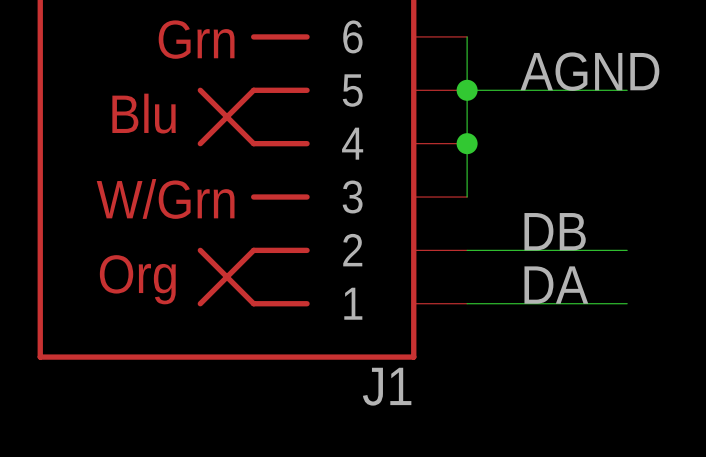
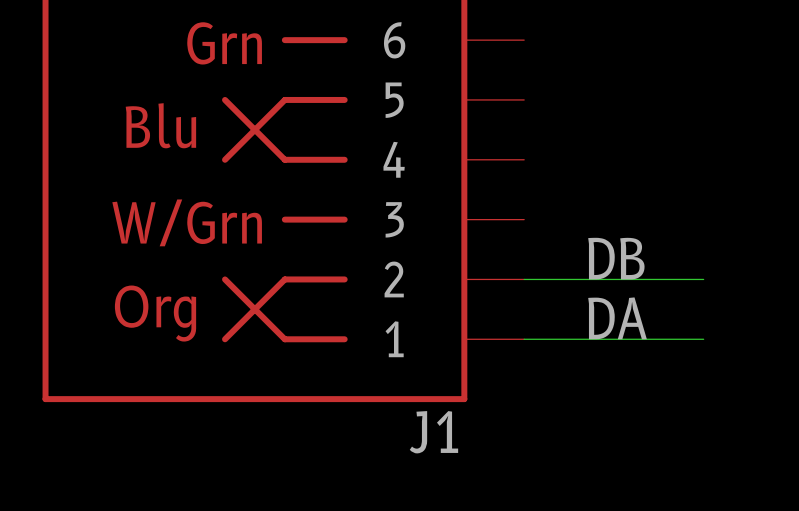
wire: (467, 36) (467, 197) -> none
label: AGND (589, 71) -> none
wire: (467, 90) (627, 90) -> none
junction: (467, 90) -> none
junction: (467, 143) -> none

